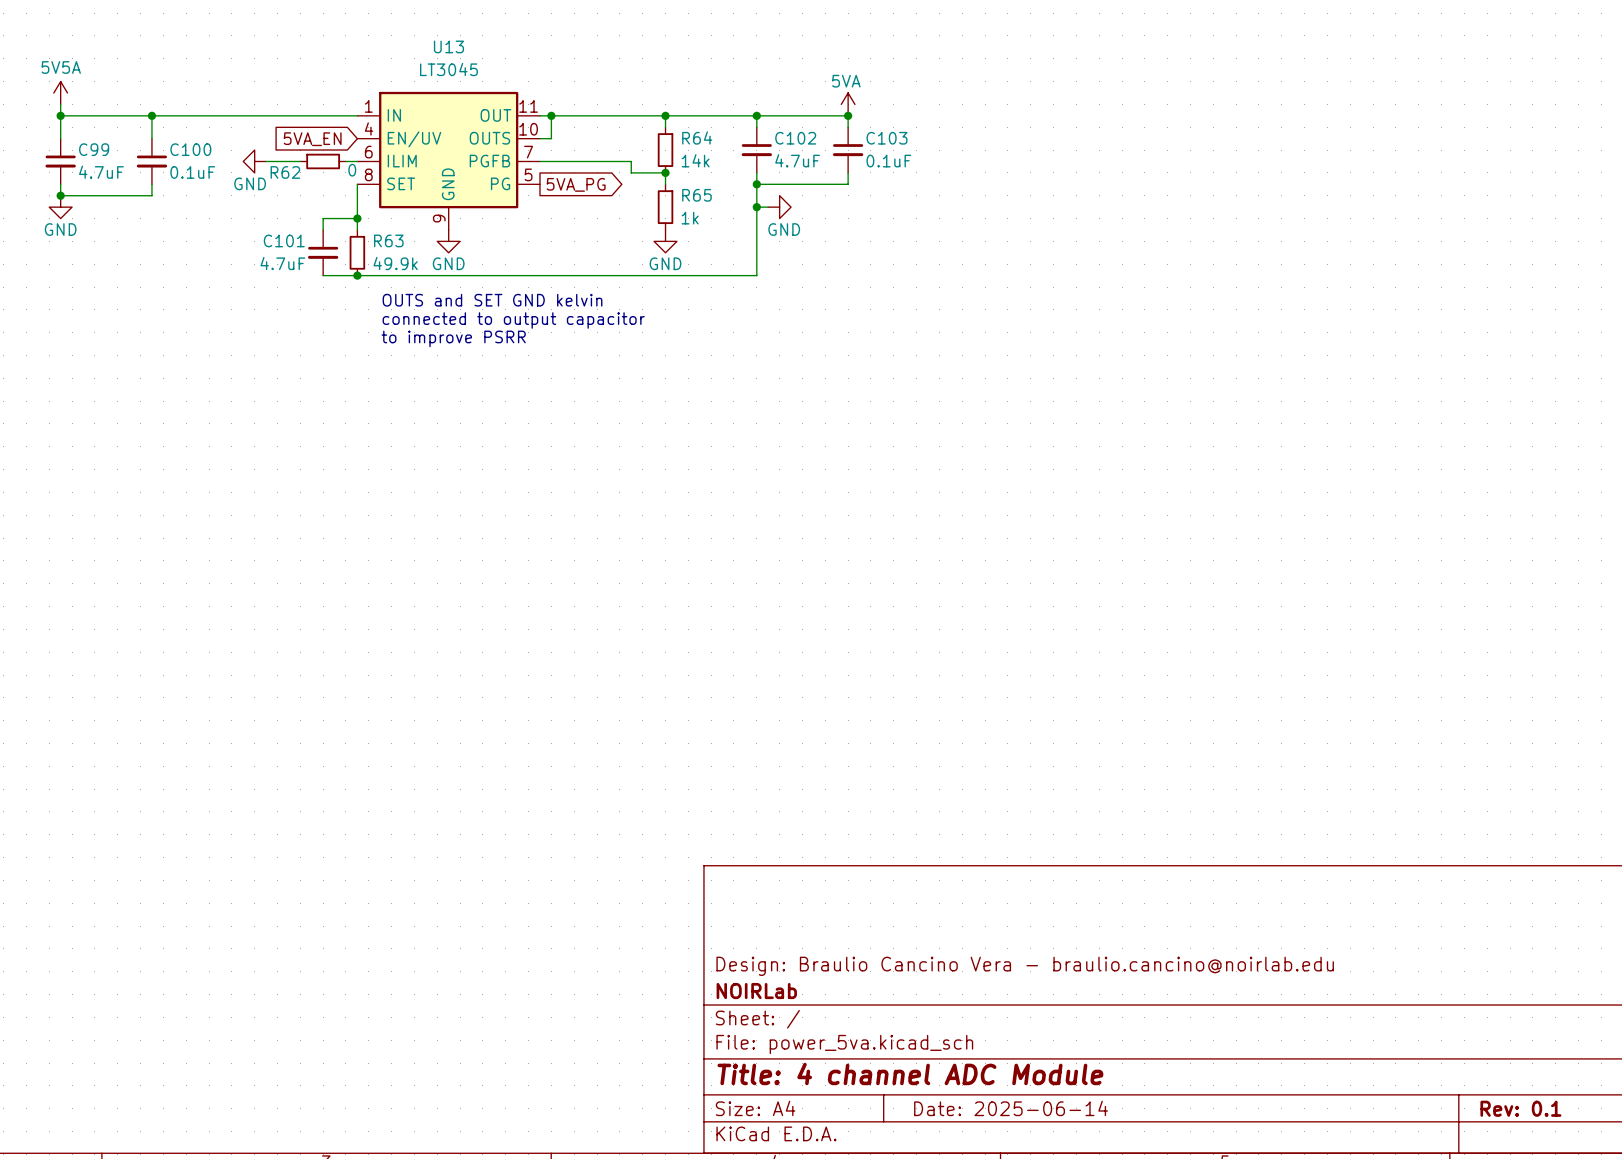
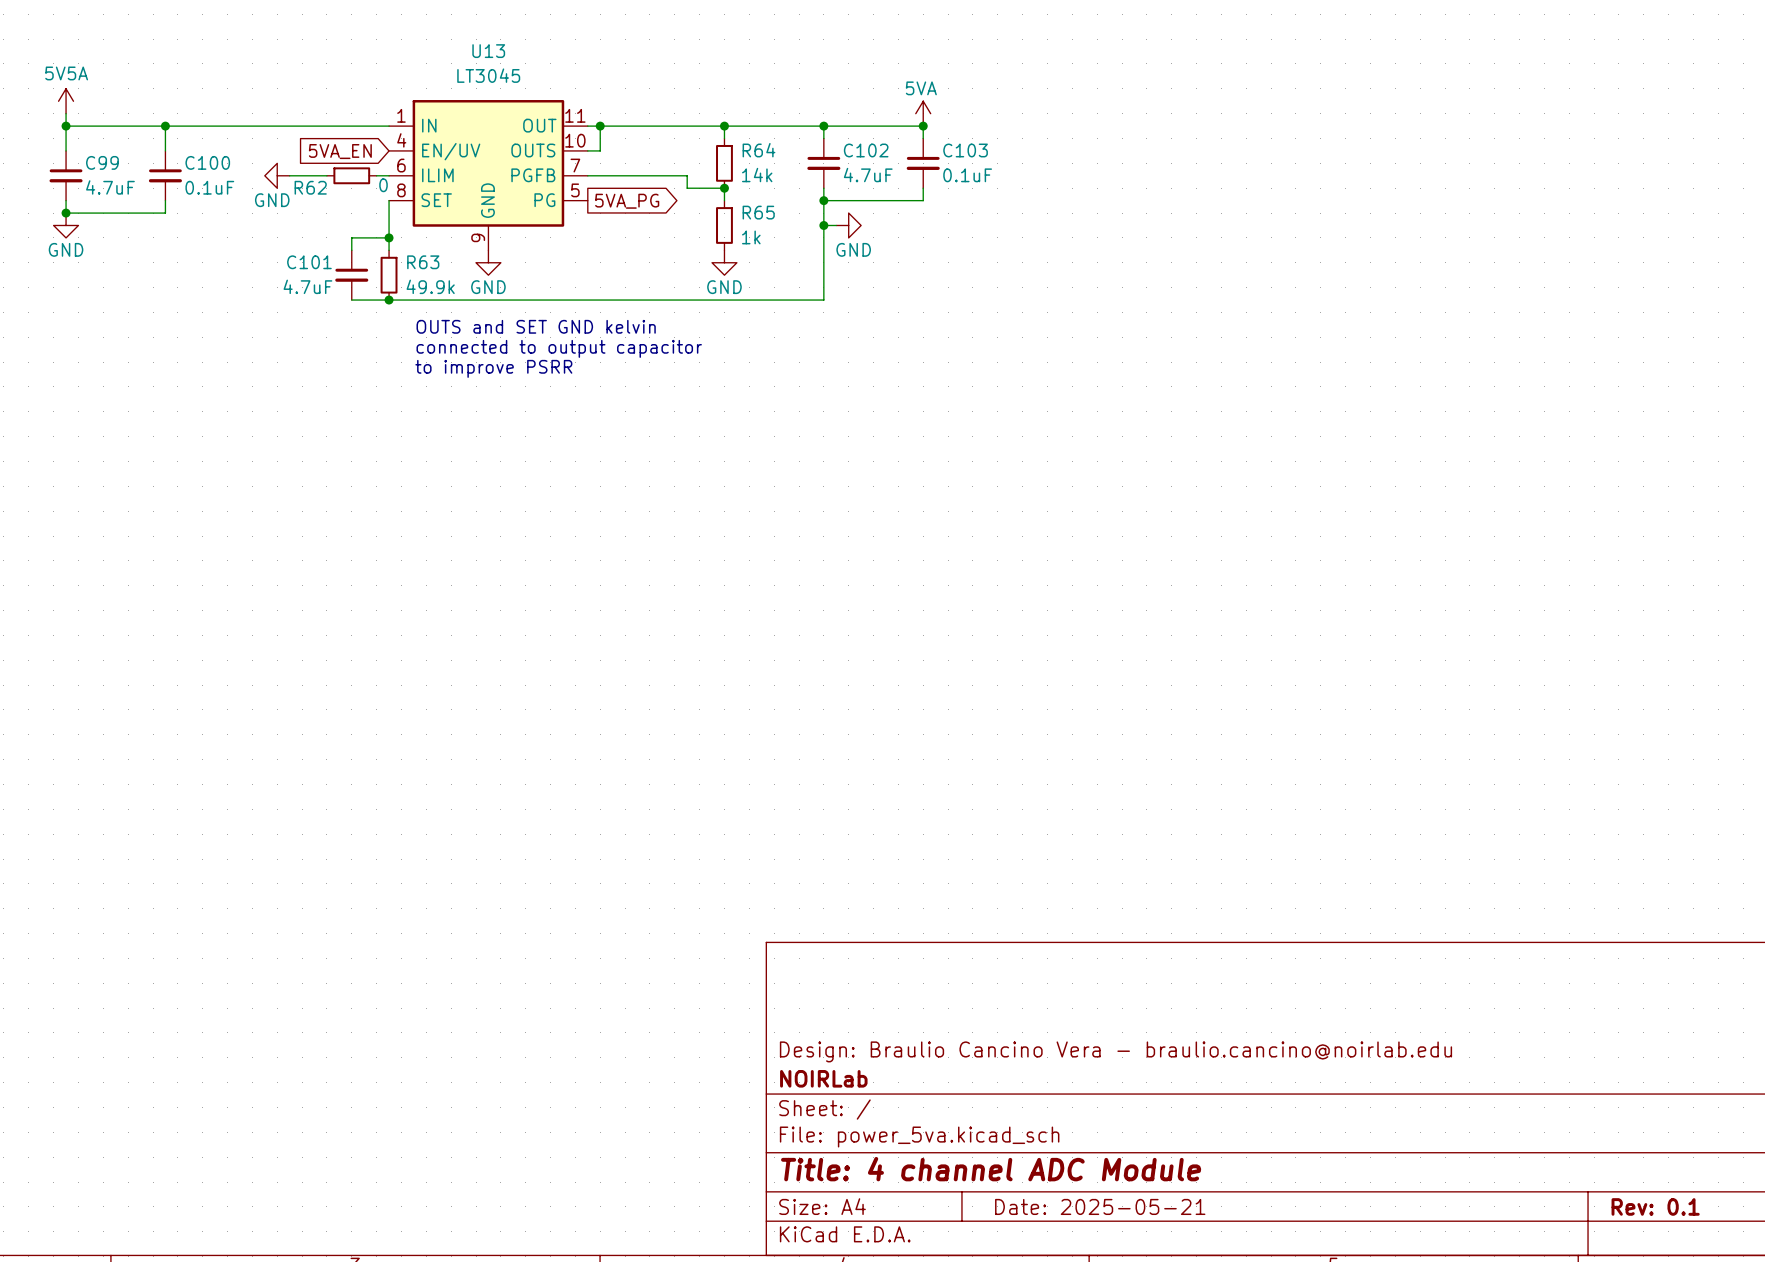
title block: Date: 2025-06-14 (1011, 1108) -> Date: 2025-05-21 (1100, 1206)

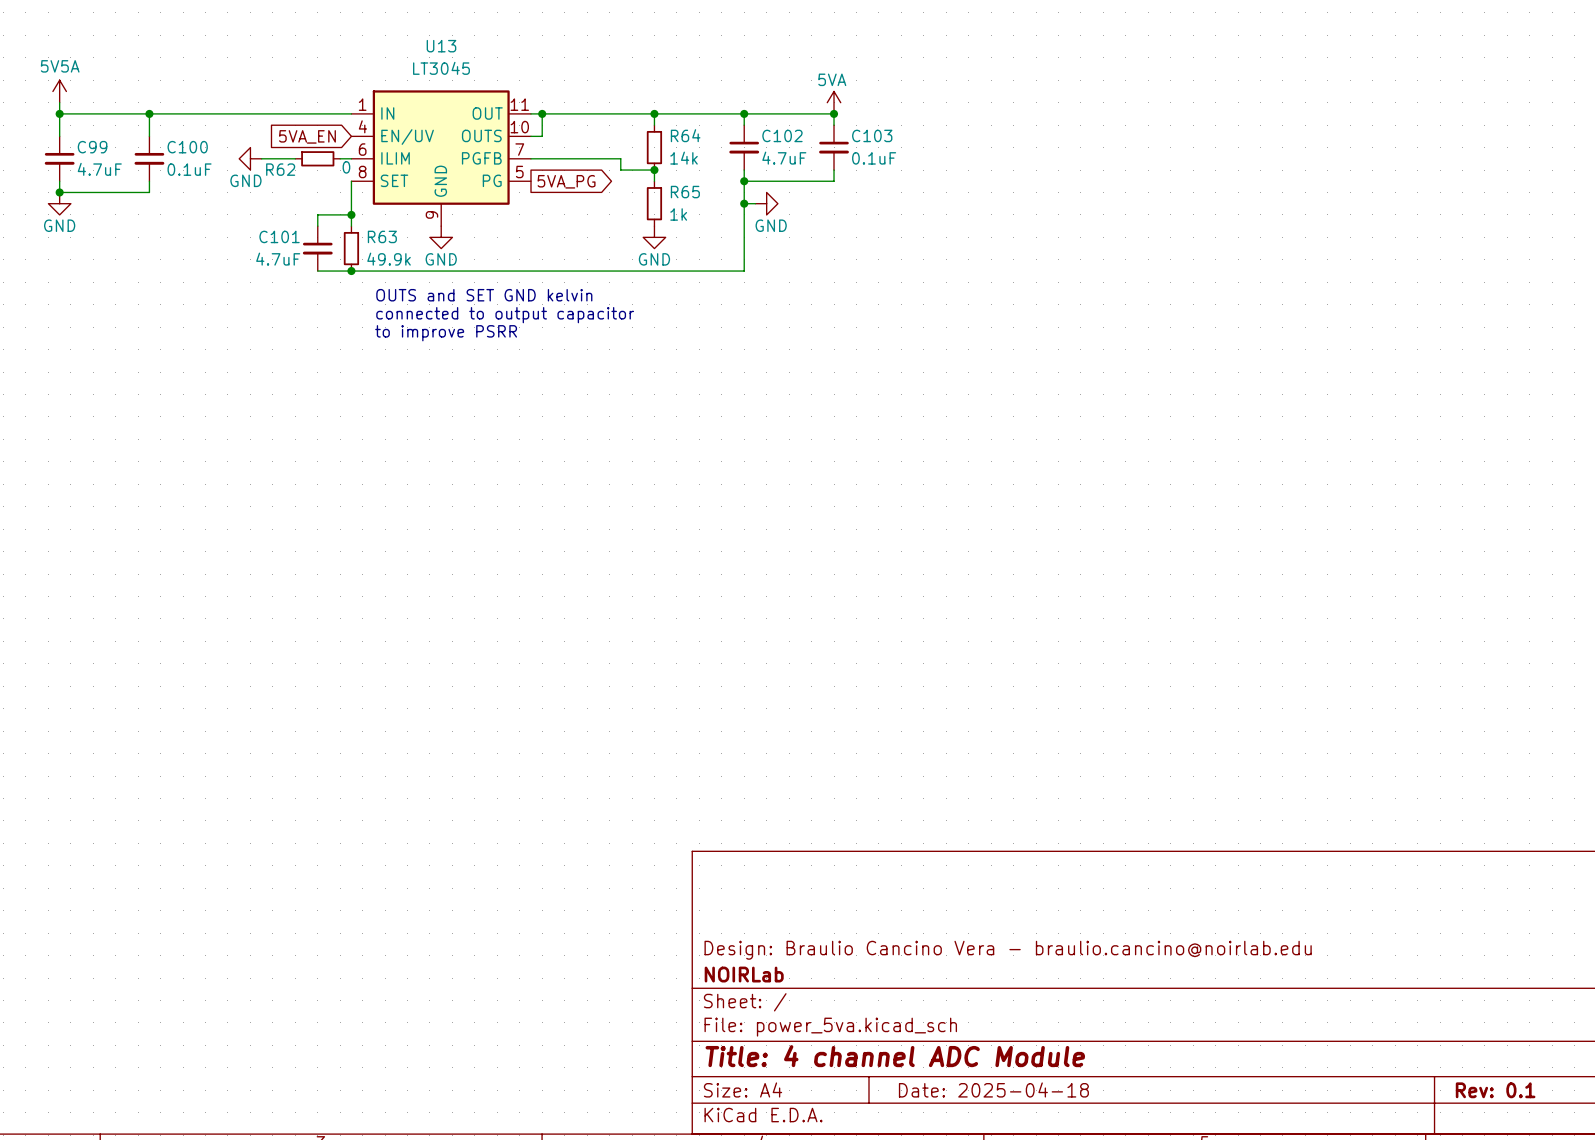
title block: Date: 2025-05-21 (1100, 1206) -> Date: 2025-04-18 (993, 1089)

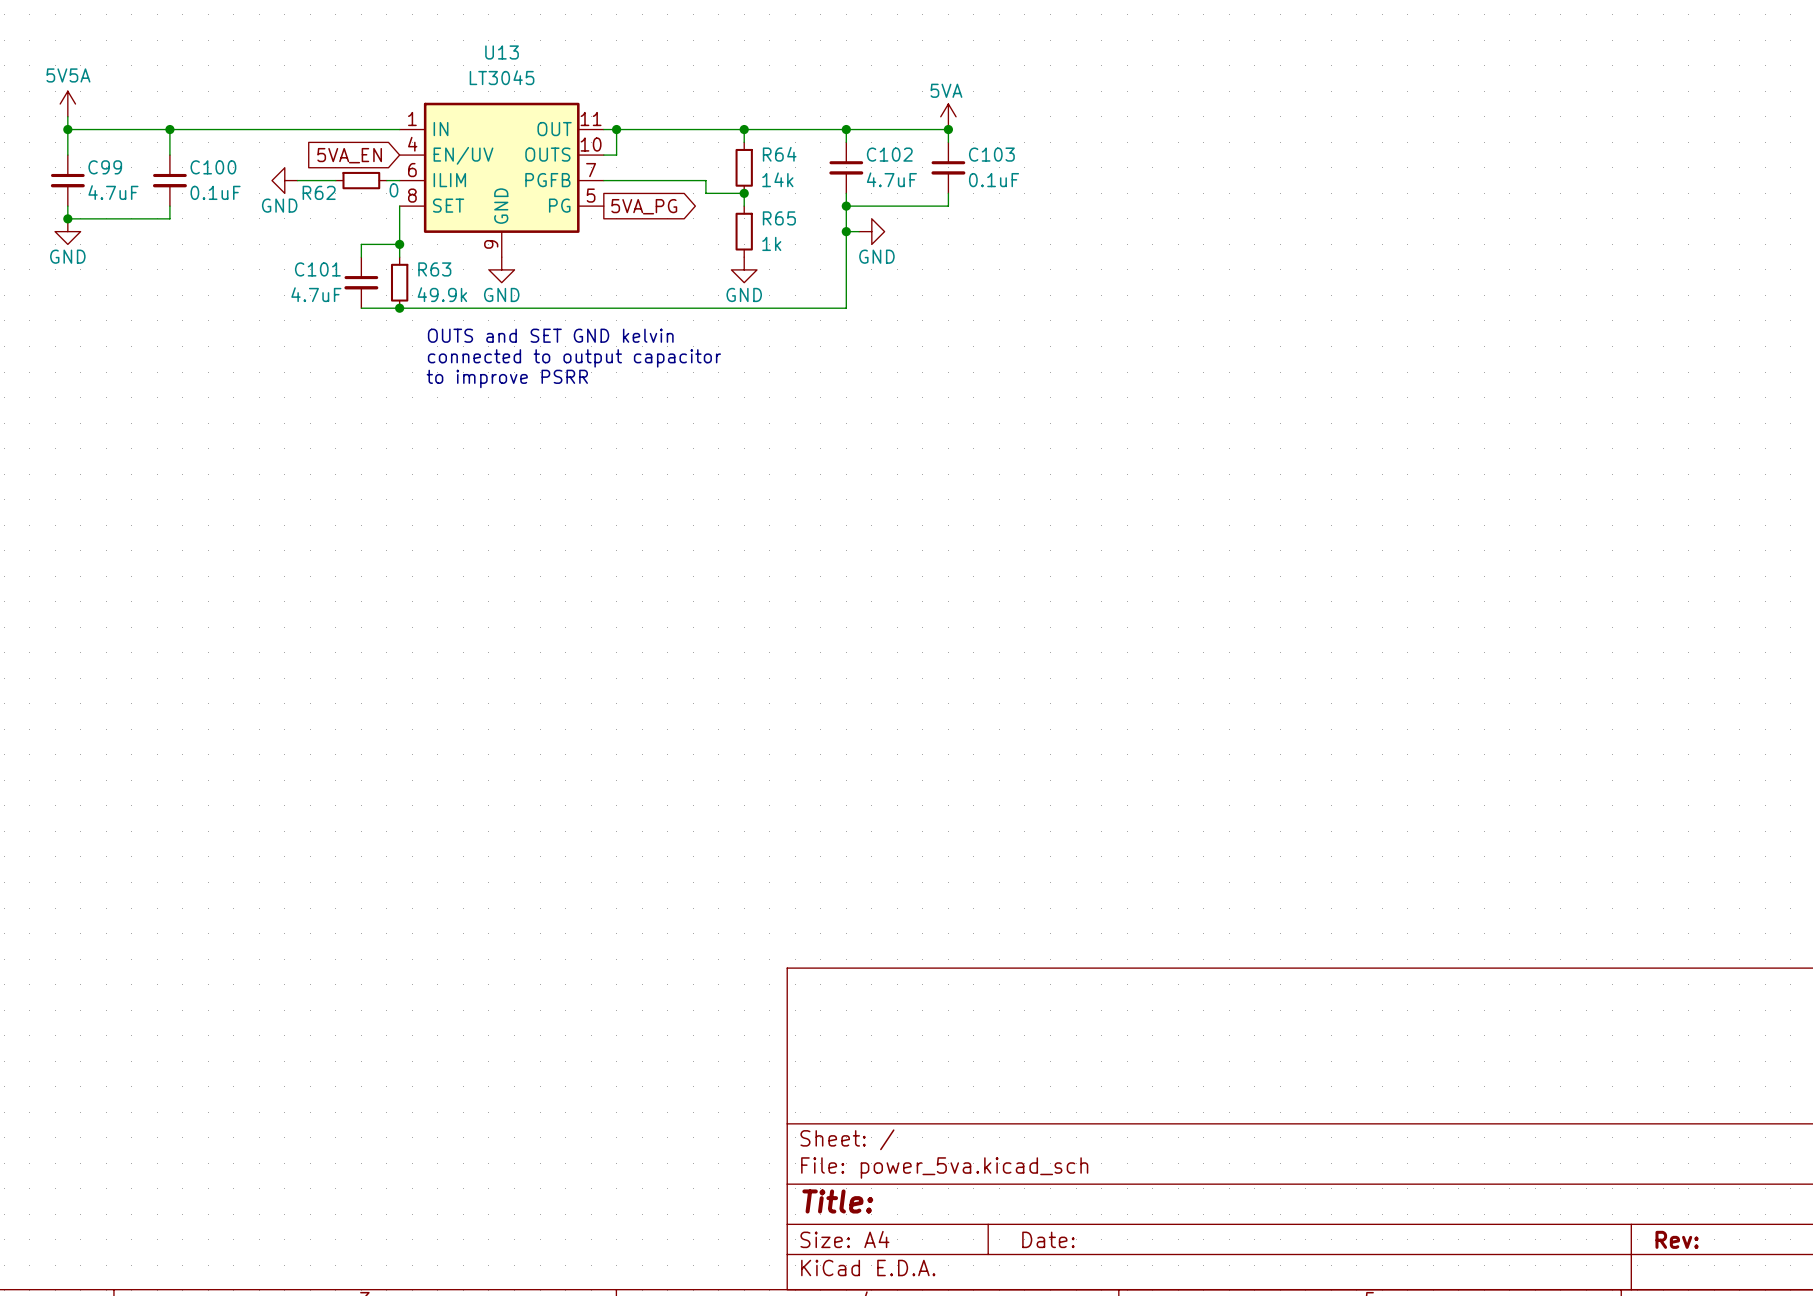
title block: Design: Braulio Cancino Vera - braulio.cancino@noirlab.edu (1008, 950) -> none
title block: NOIRLab (744, 974) -> none
title block: Title: 4 channel ADC Module (895, 1056) -> Title: (837, 1201)
title block: Date: 2025-04-18 (993, 1089) -> Date: (1048, 1239)
title block: Rev: 0.1 (1495, 1090) -> Rev: (1677, 1239)

